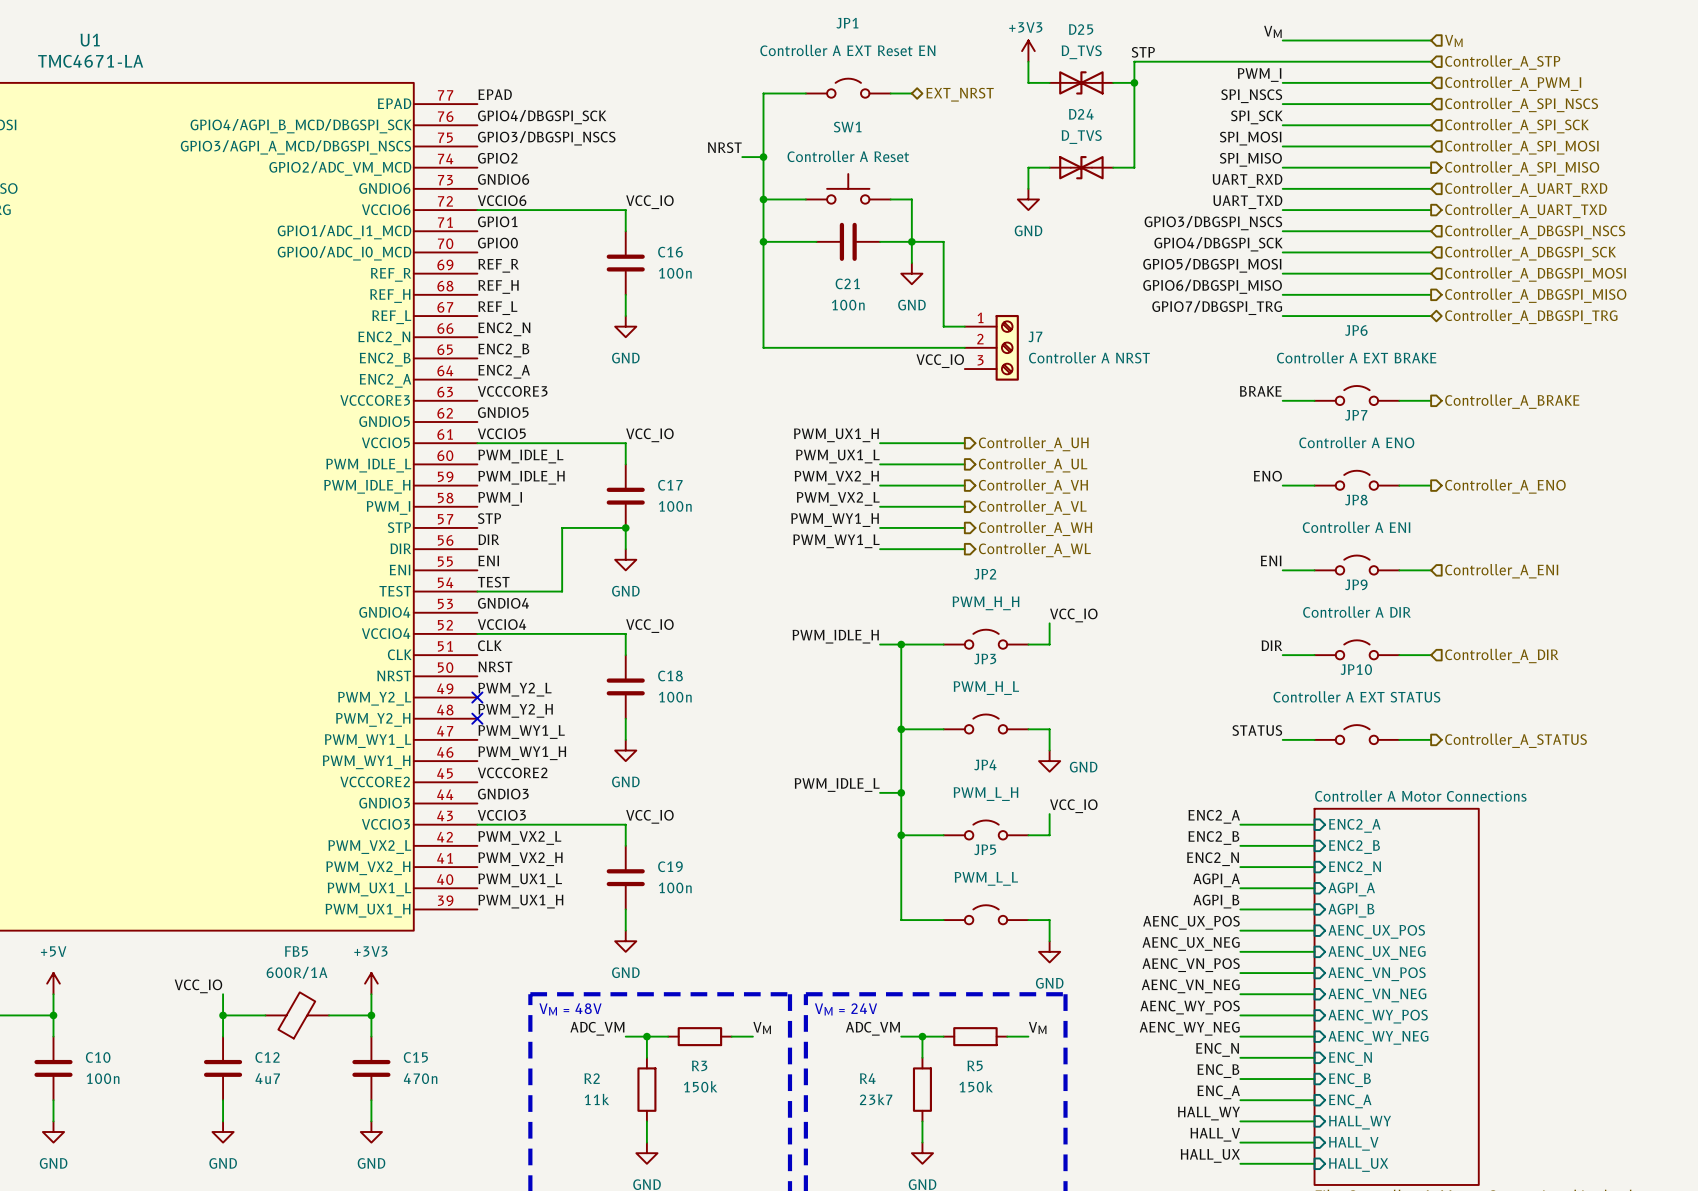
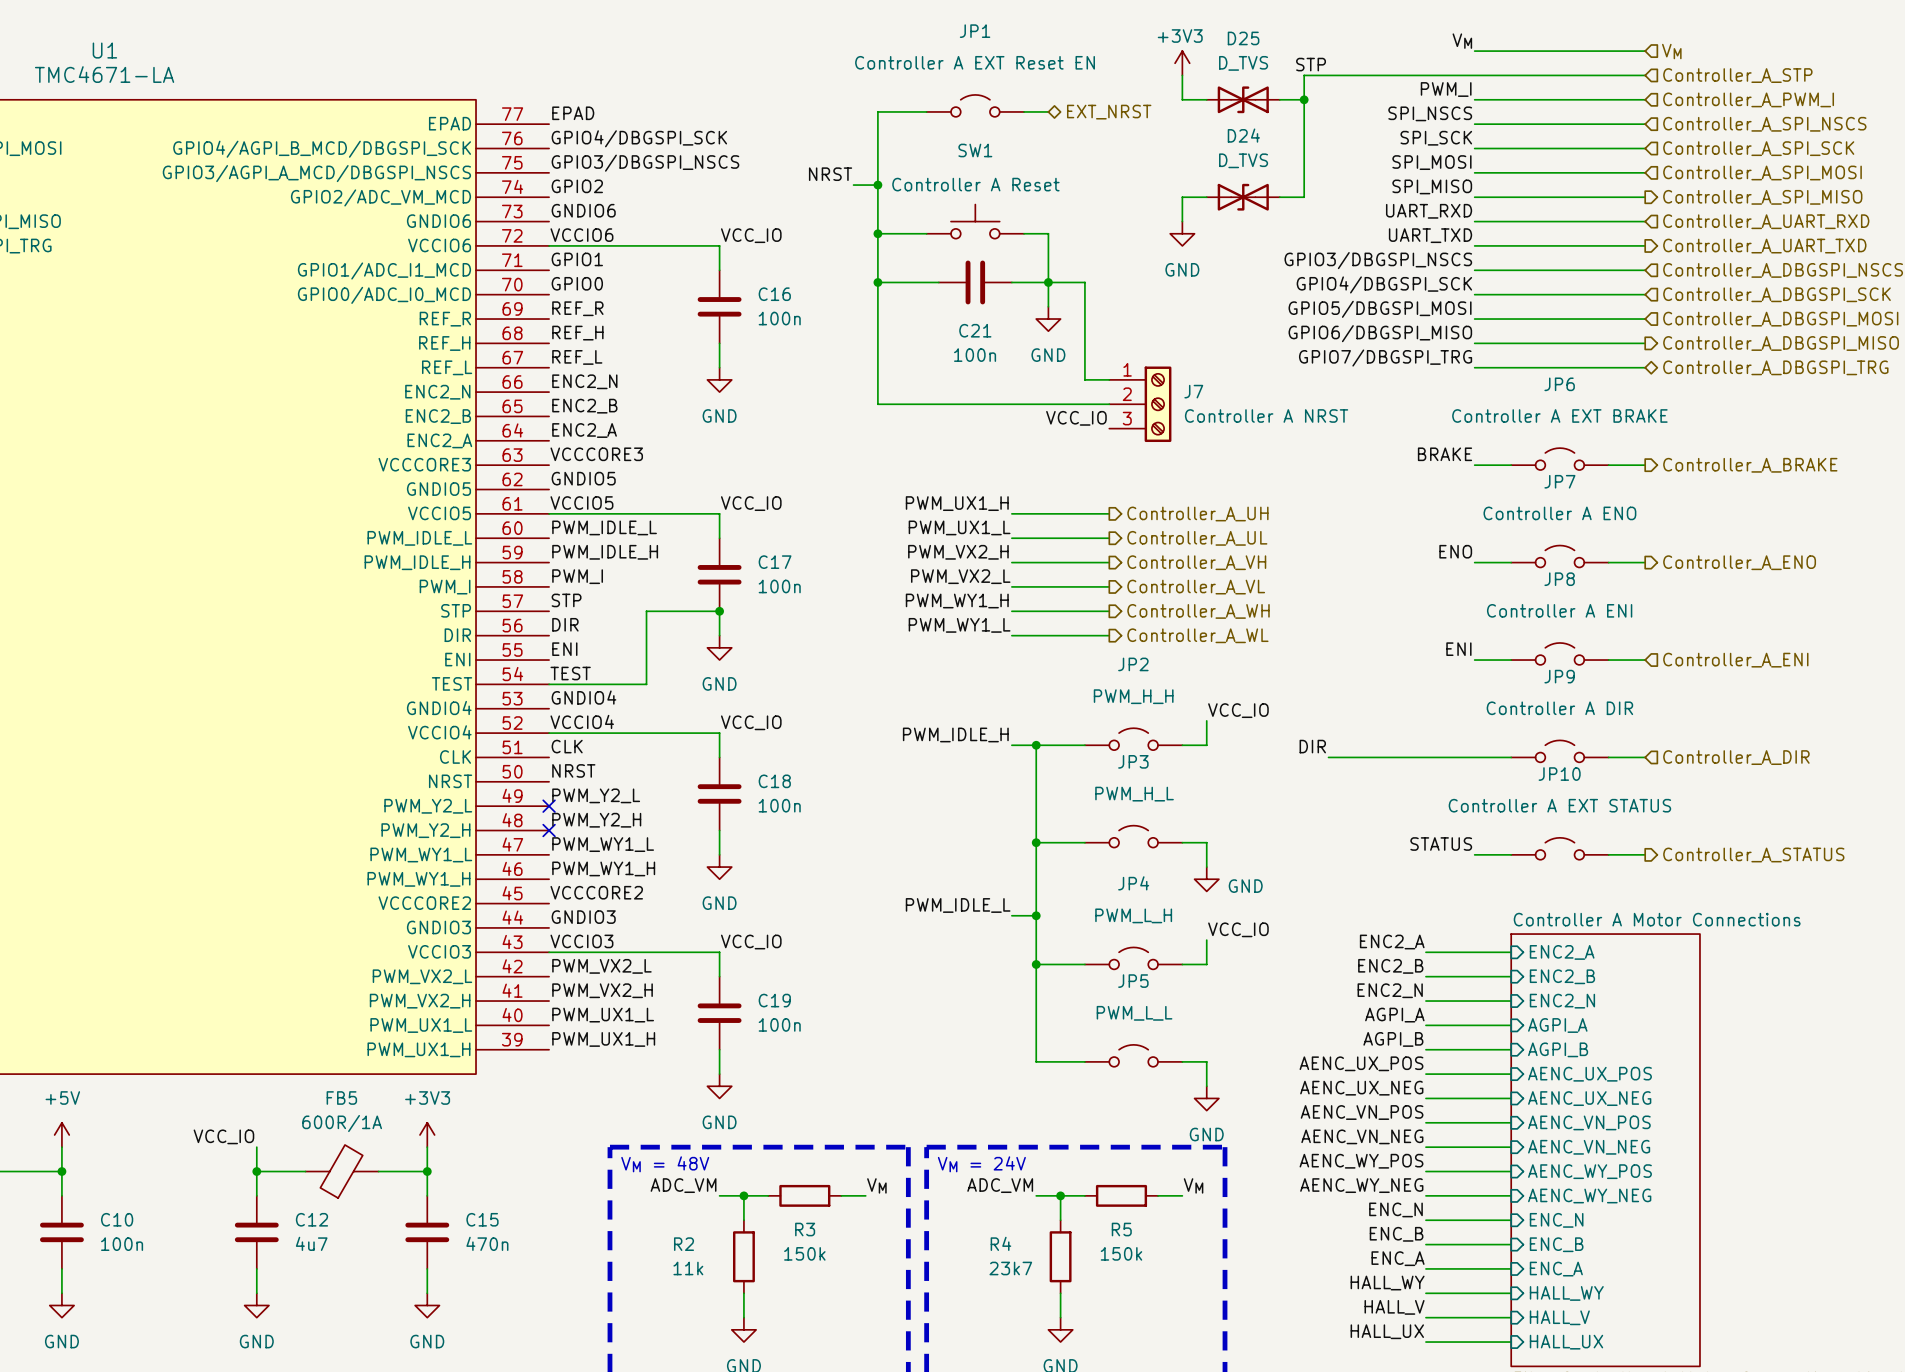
label position: DIR (1271, 645) -> DIR (1312, 746)
wire: none -> (1328, 757) (1474, 757)

